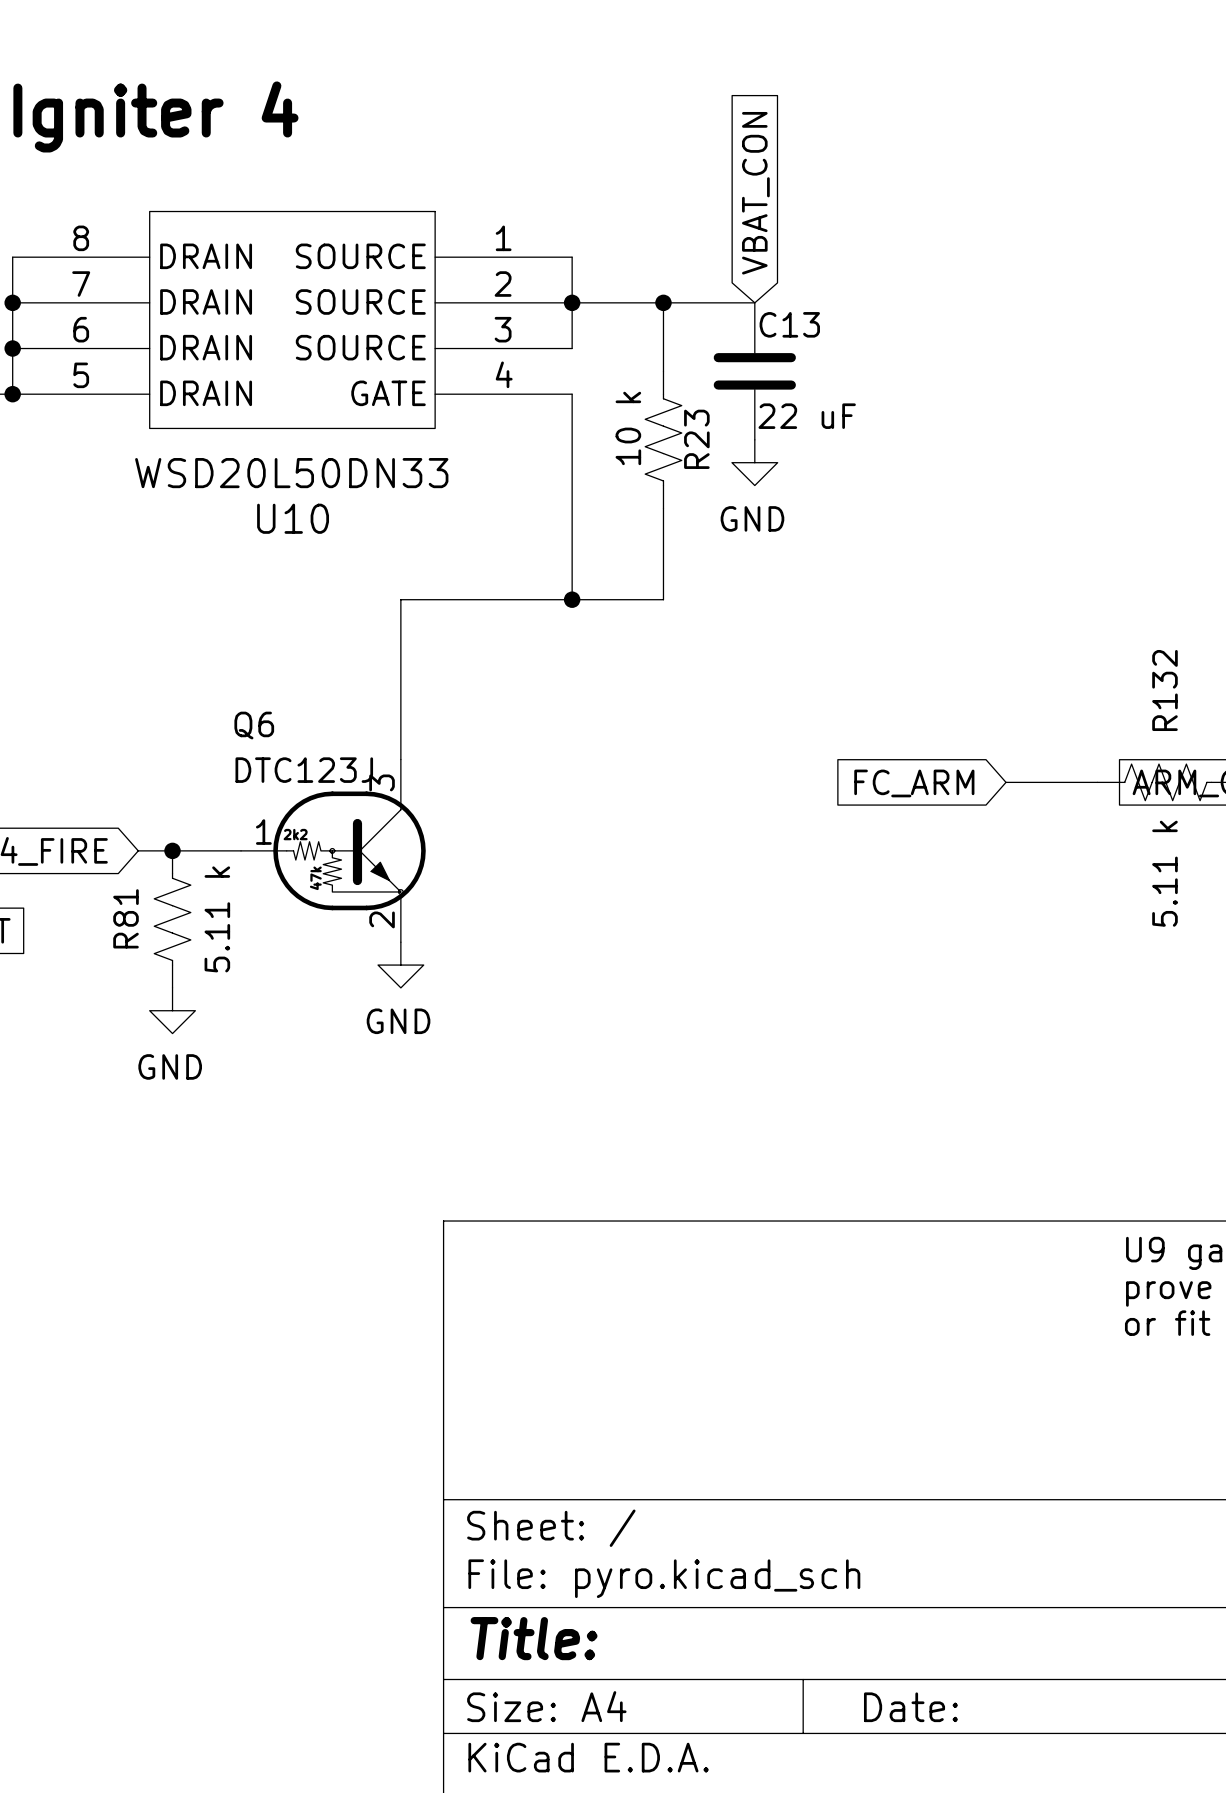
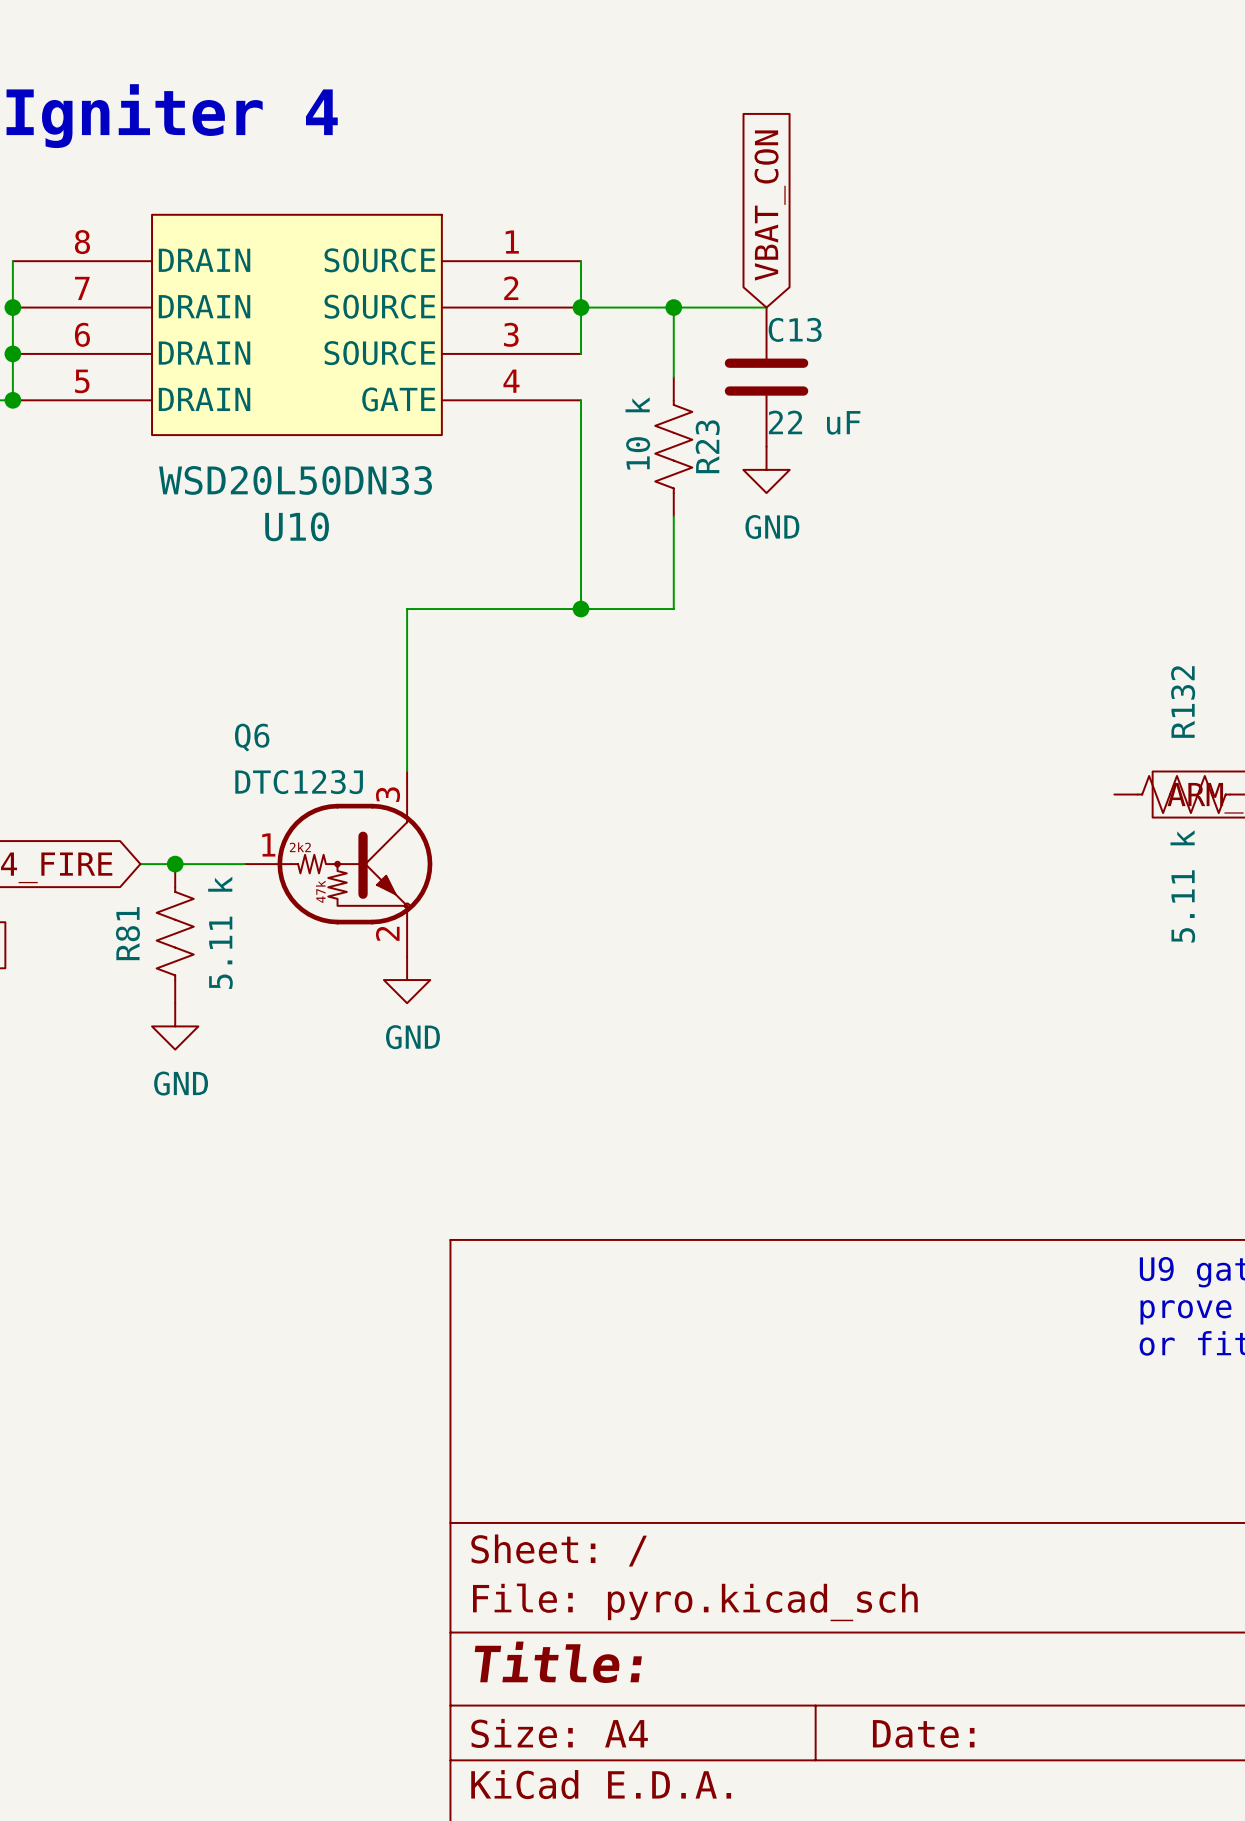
wire: (1006, 782) (1097, 782) -> none
global label: FC_ARM (914, 783) -> none

